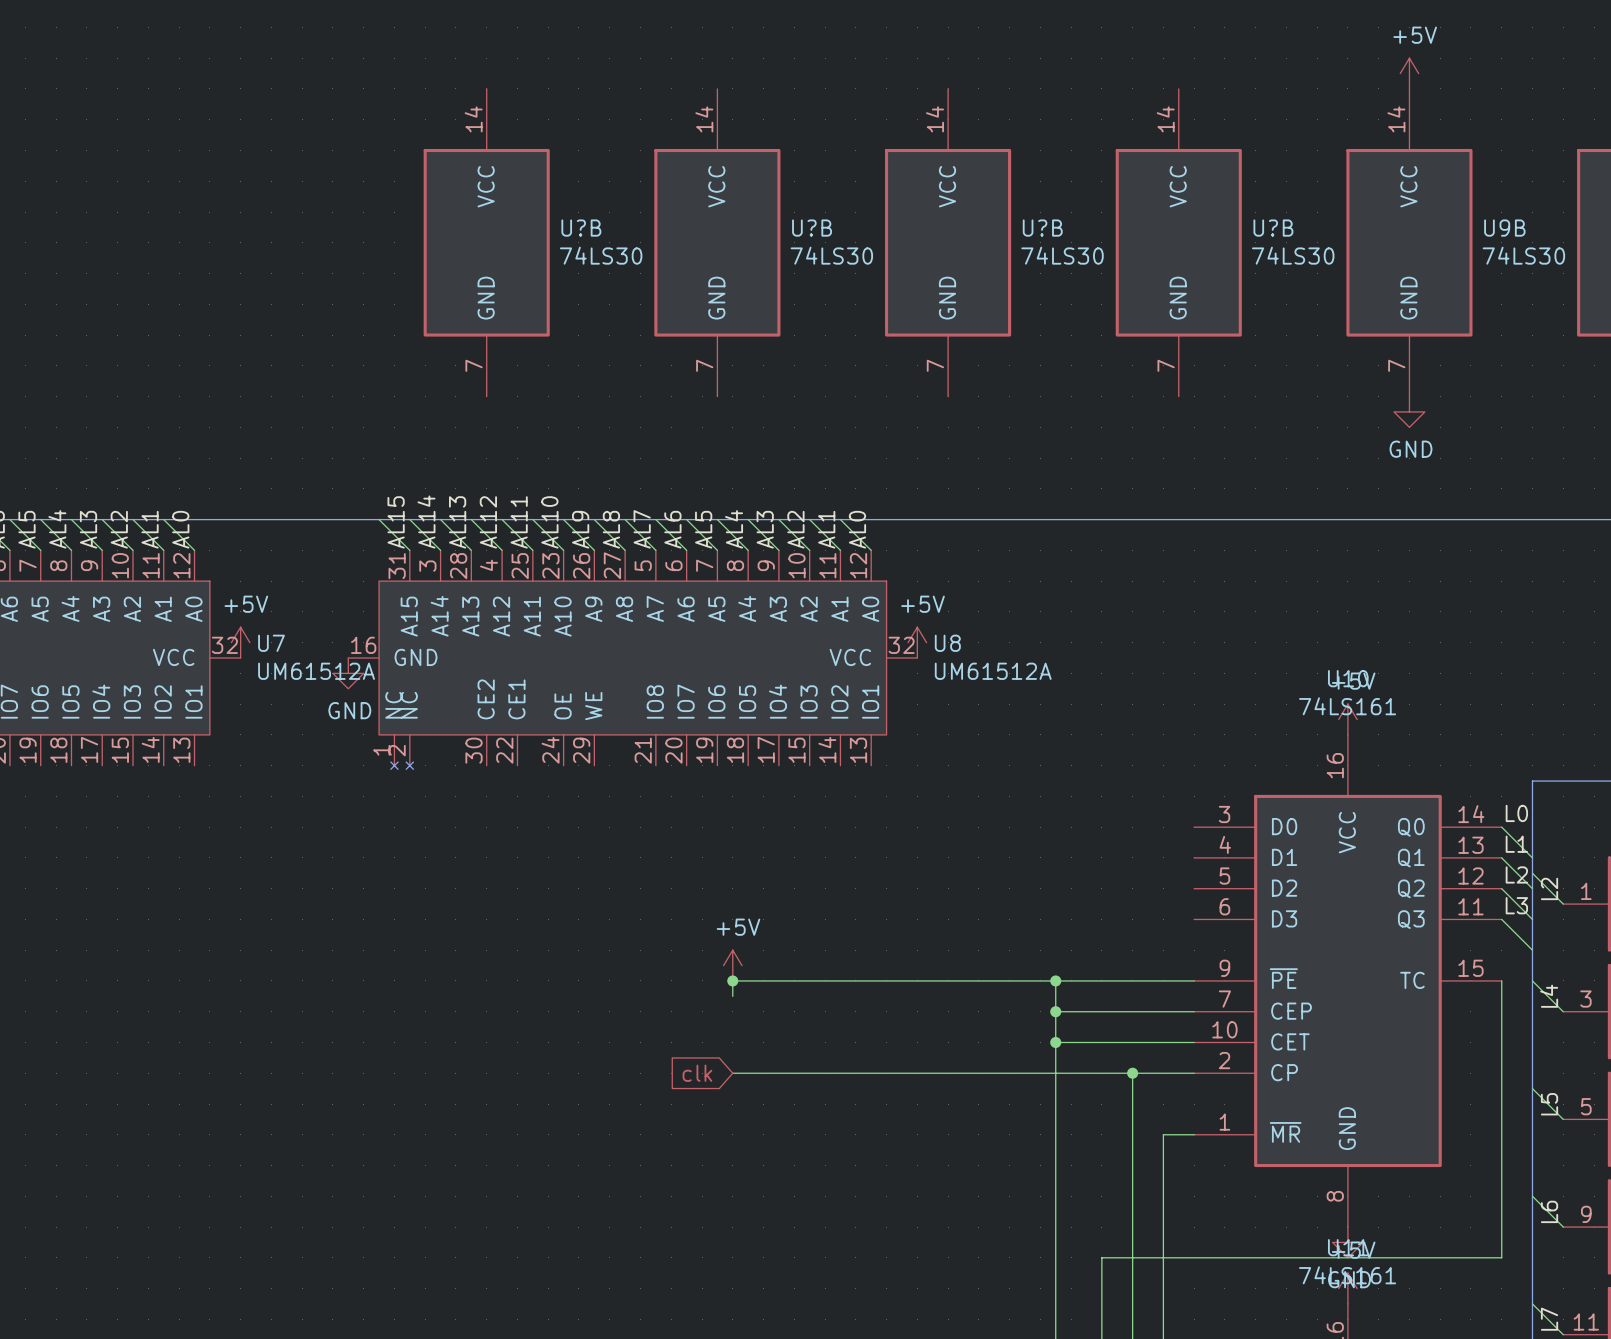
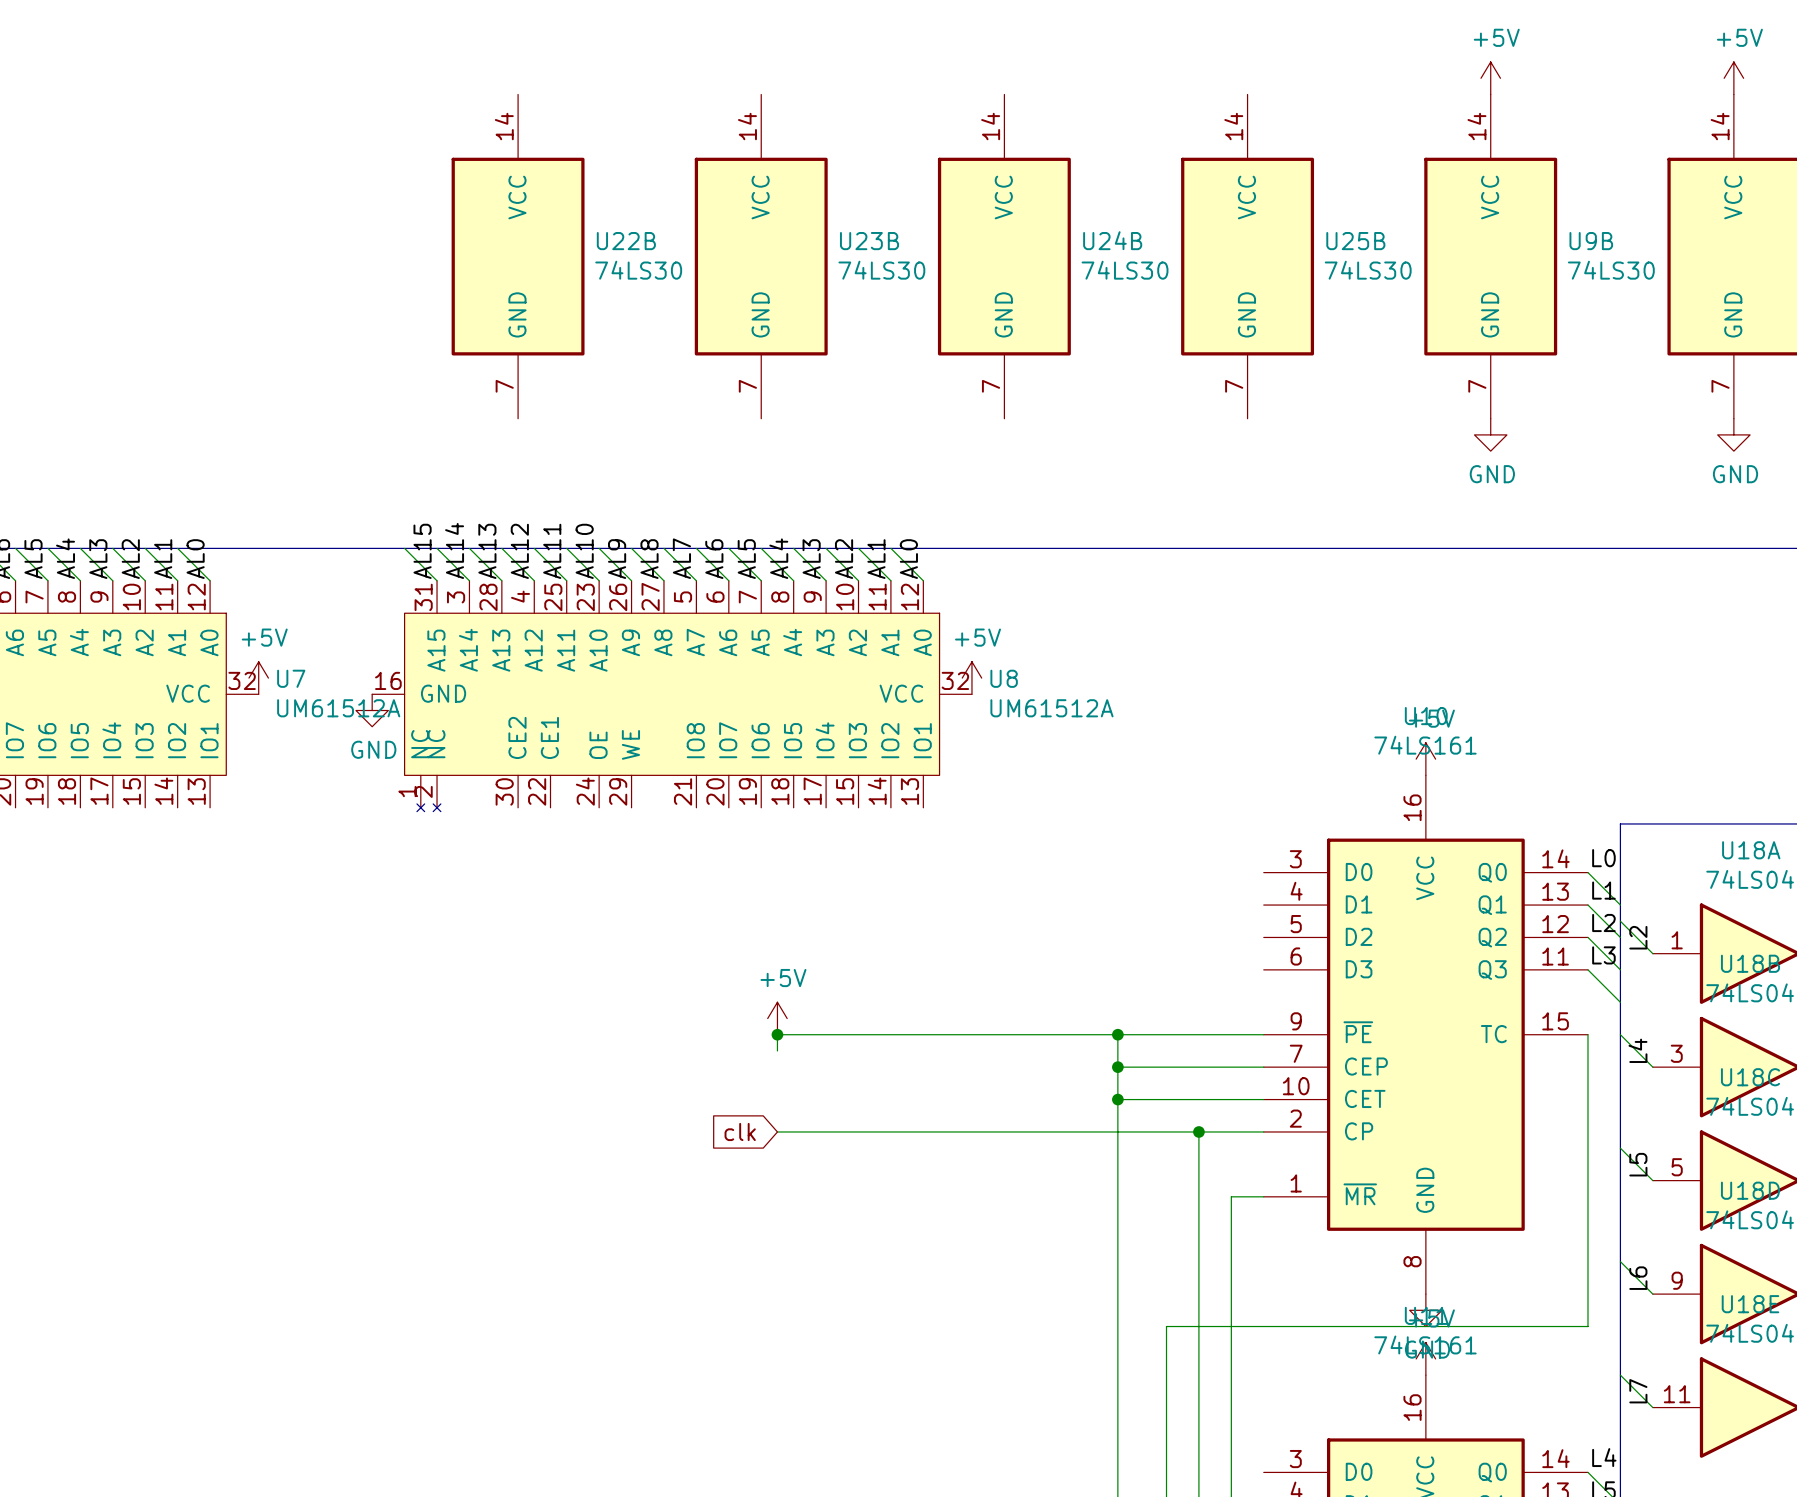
U?B name: U?B (581, 228) -> U22B (626, 241)
U?B name: U?B (812, 228) -> U23B (869, 241)
U?B name: U?B (1042, 228) -> U24B (1112, 240)
U?B name: U?B (1273, 228) -> U25B (1355, 241)

